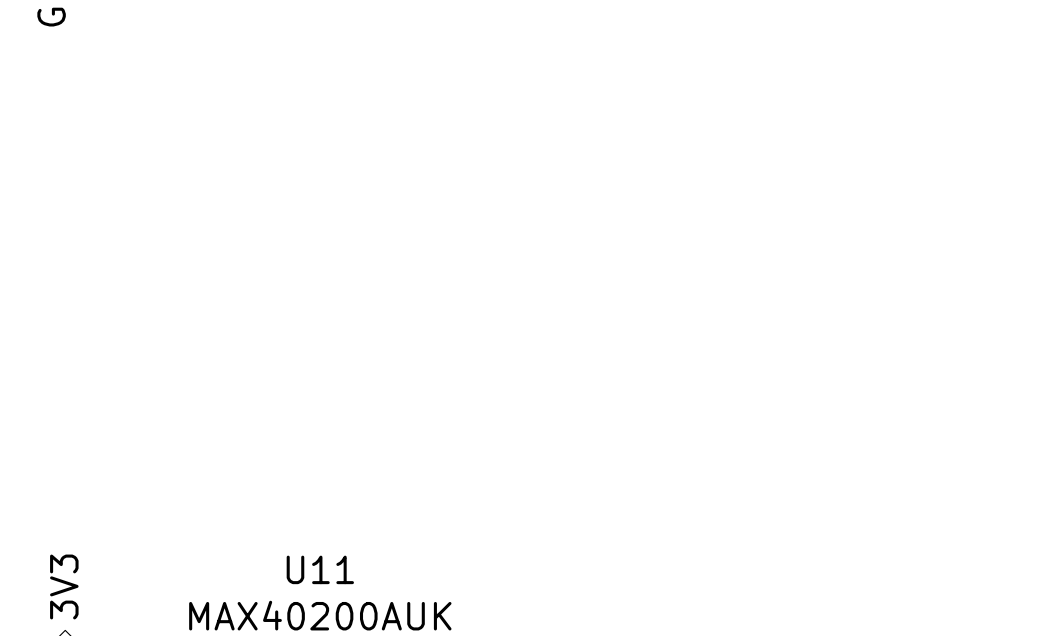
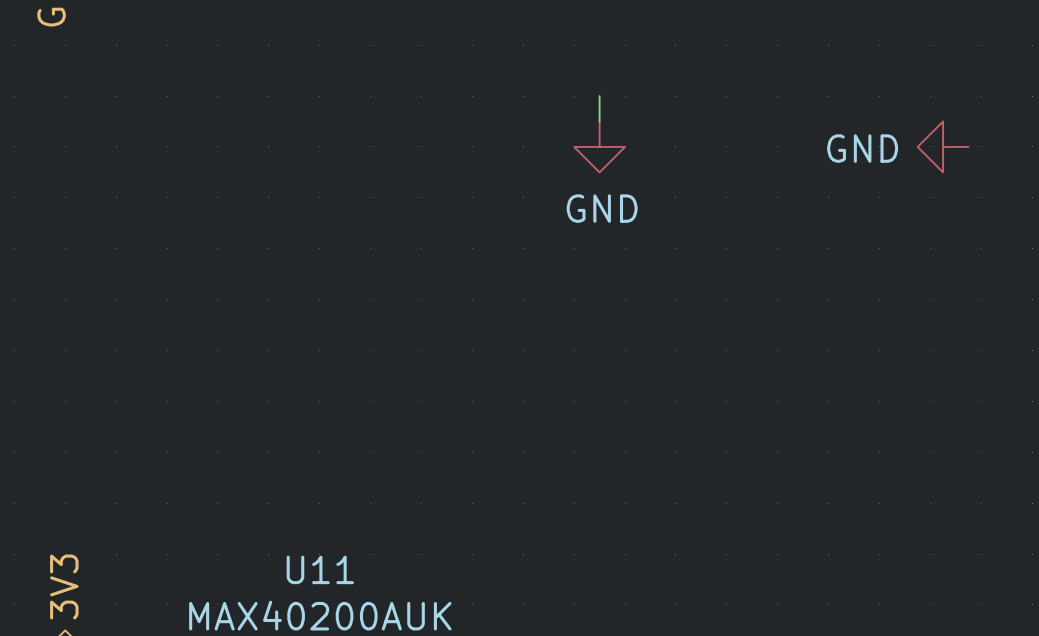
wire: none -> (599, 96) (599, 121)
power symbol: none -> GND (599, 146)
power symbol: none -> GND (943, 146)

